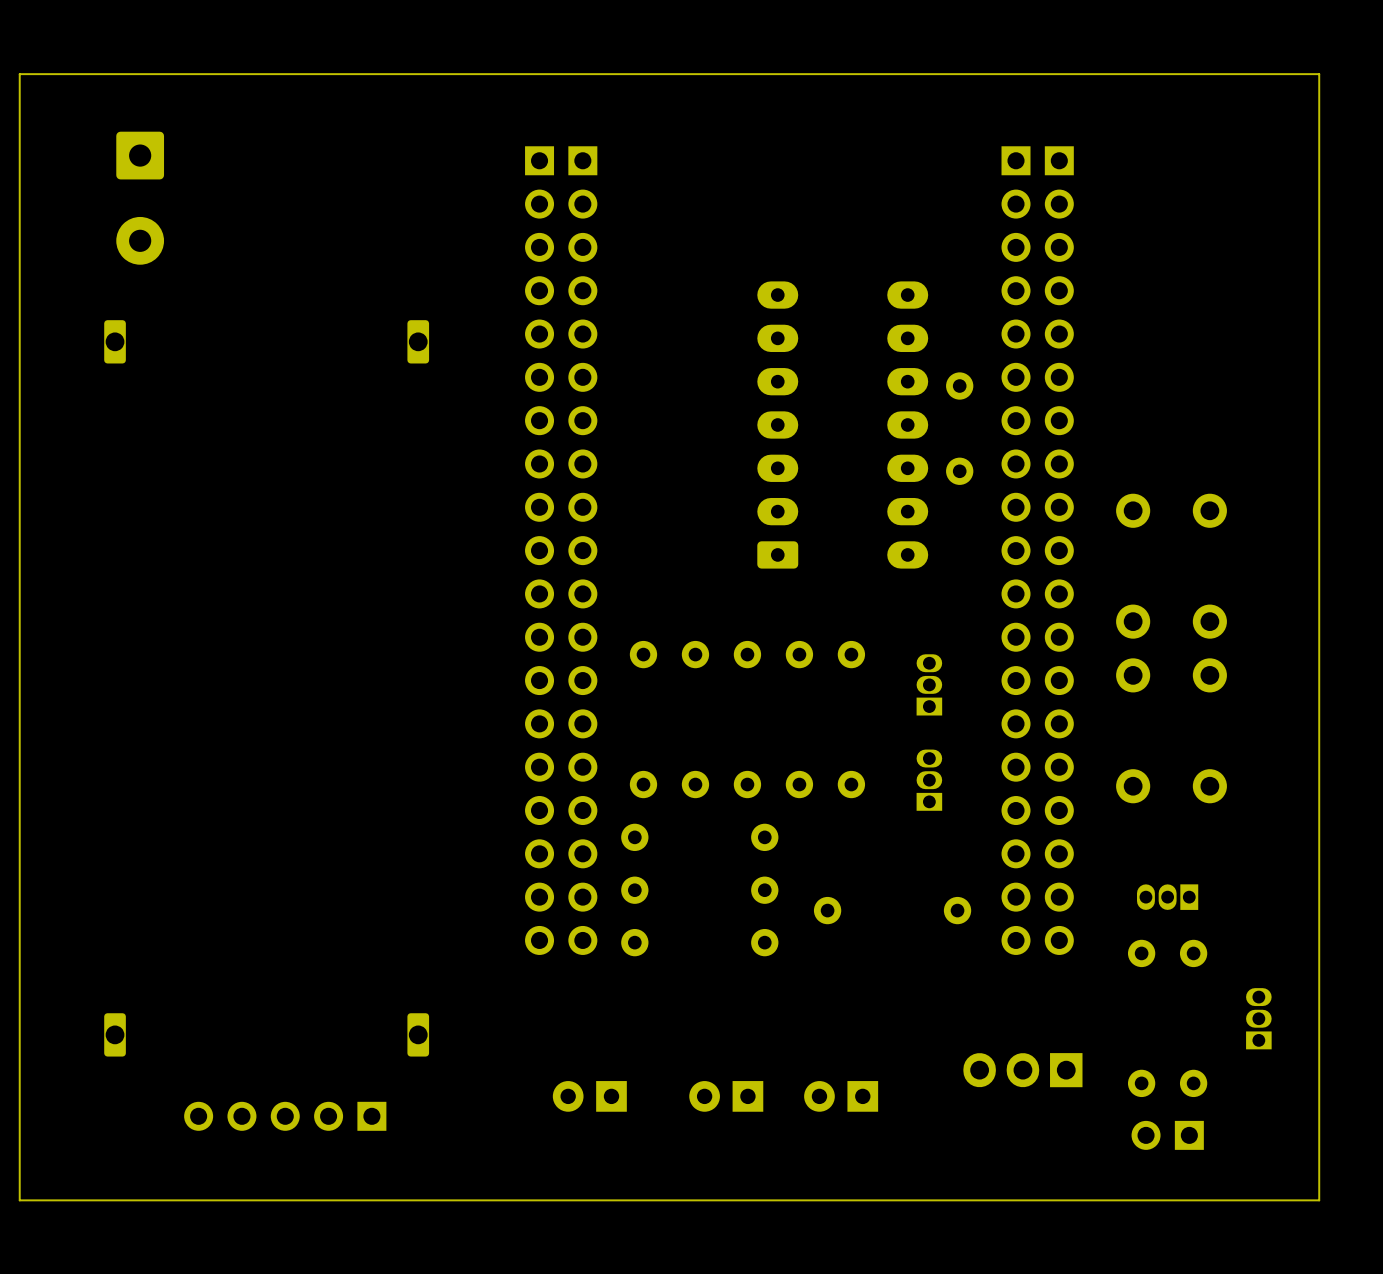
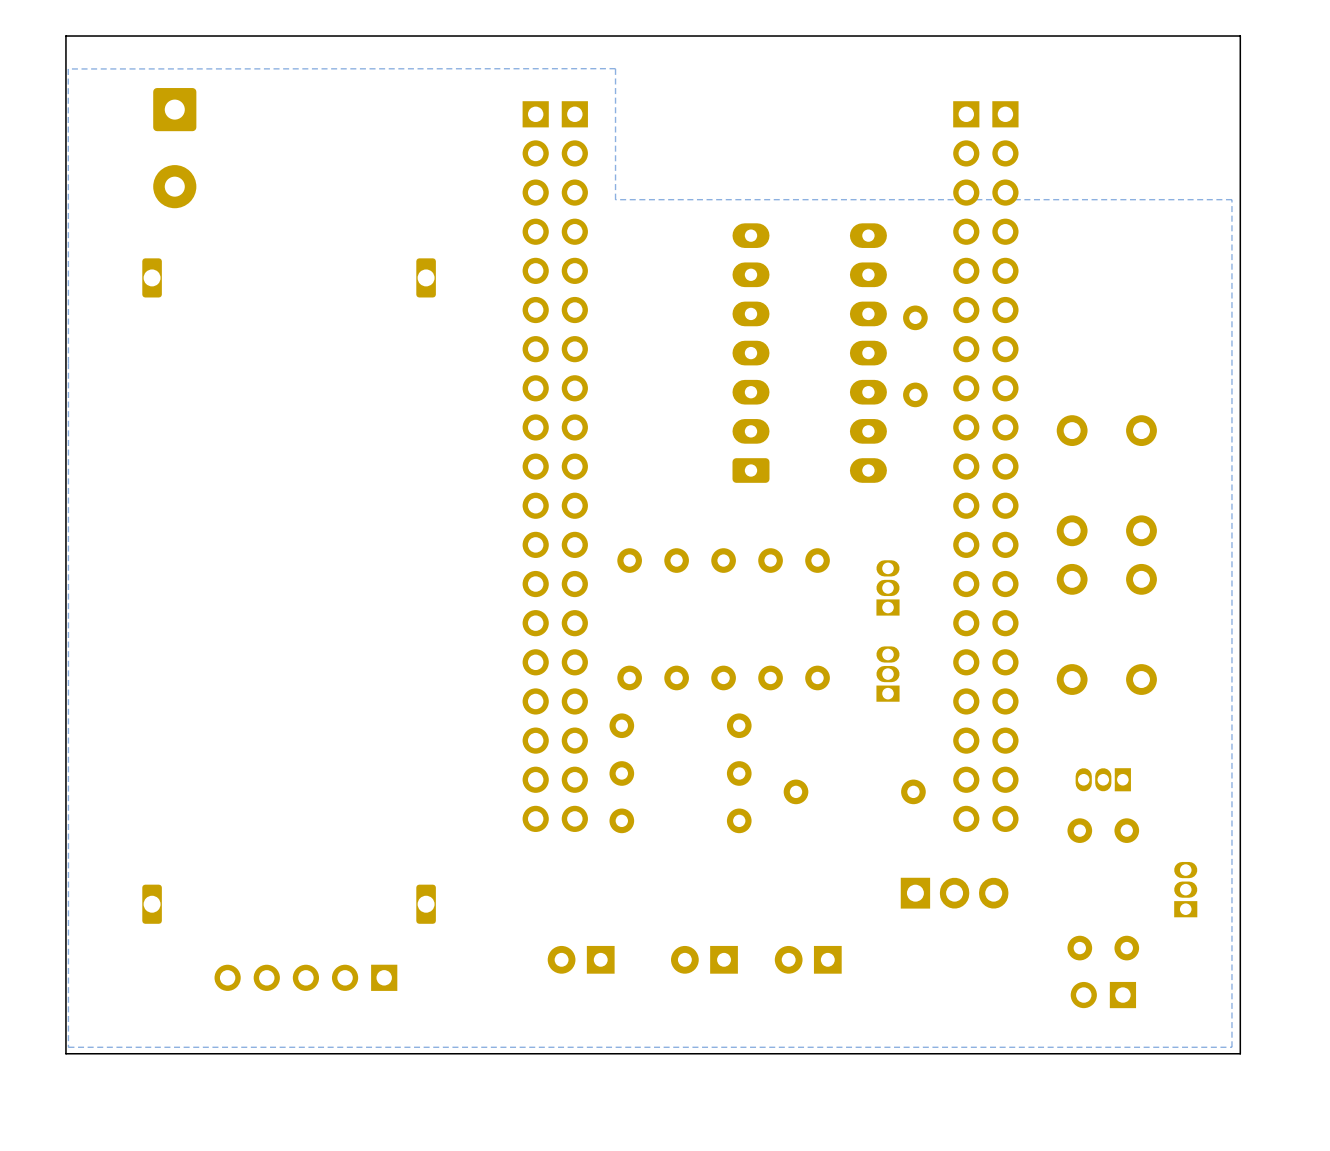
zone outline: none -> (615, 68) (615, 199) (1231, 199) (1231, 1047) (68, 1047) (68, 68) (615, 68)
part rotation: 0° (1022, 1070) -> 180° (954, 893)

